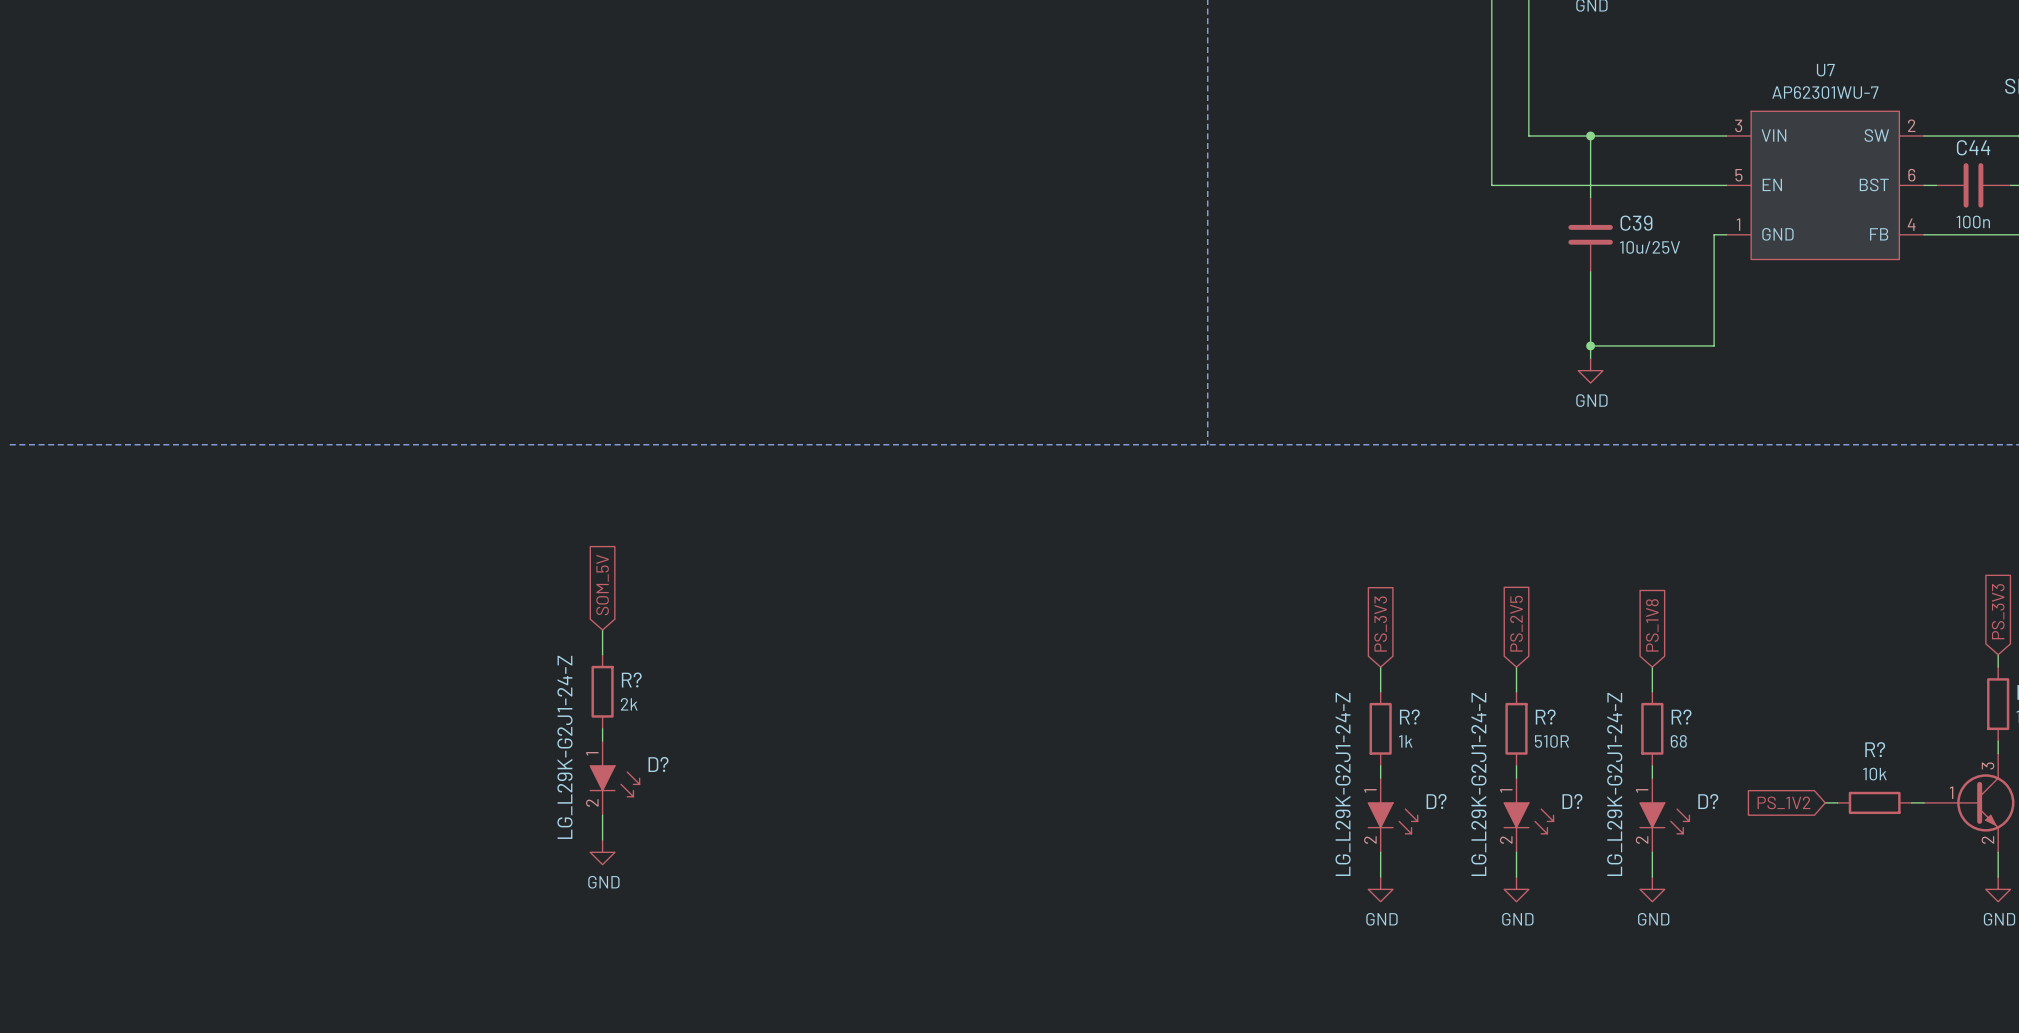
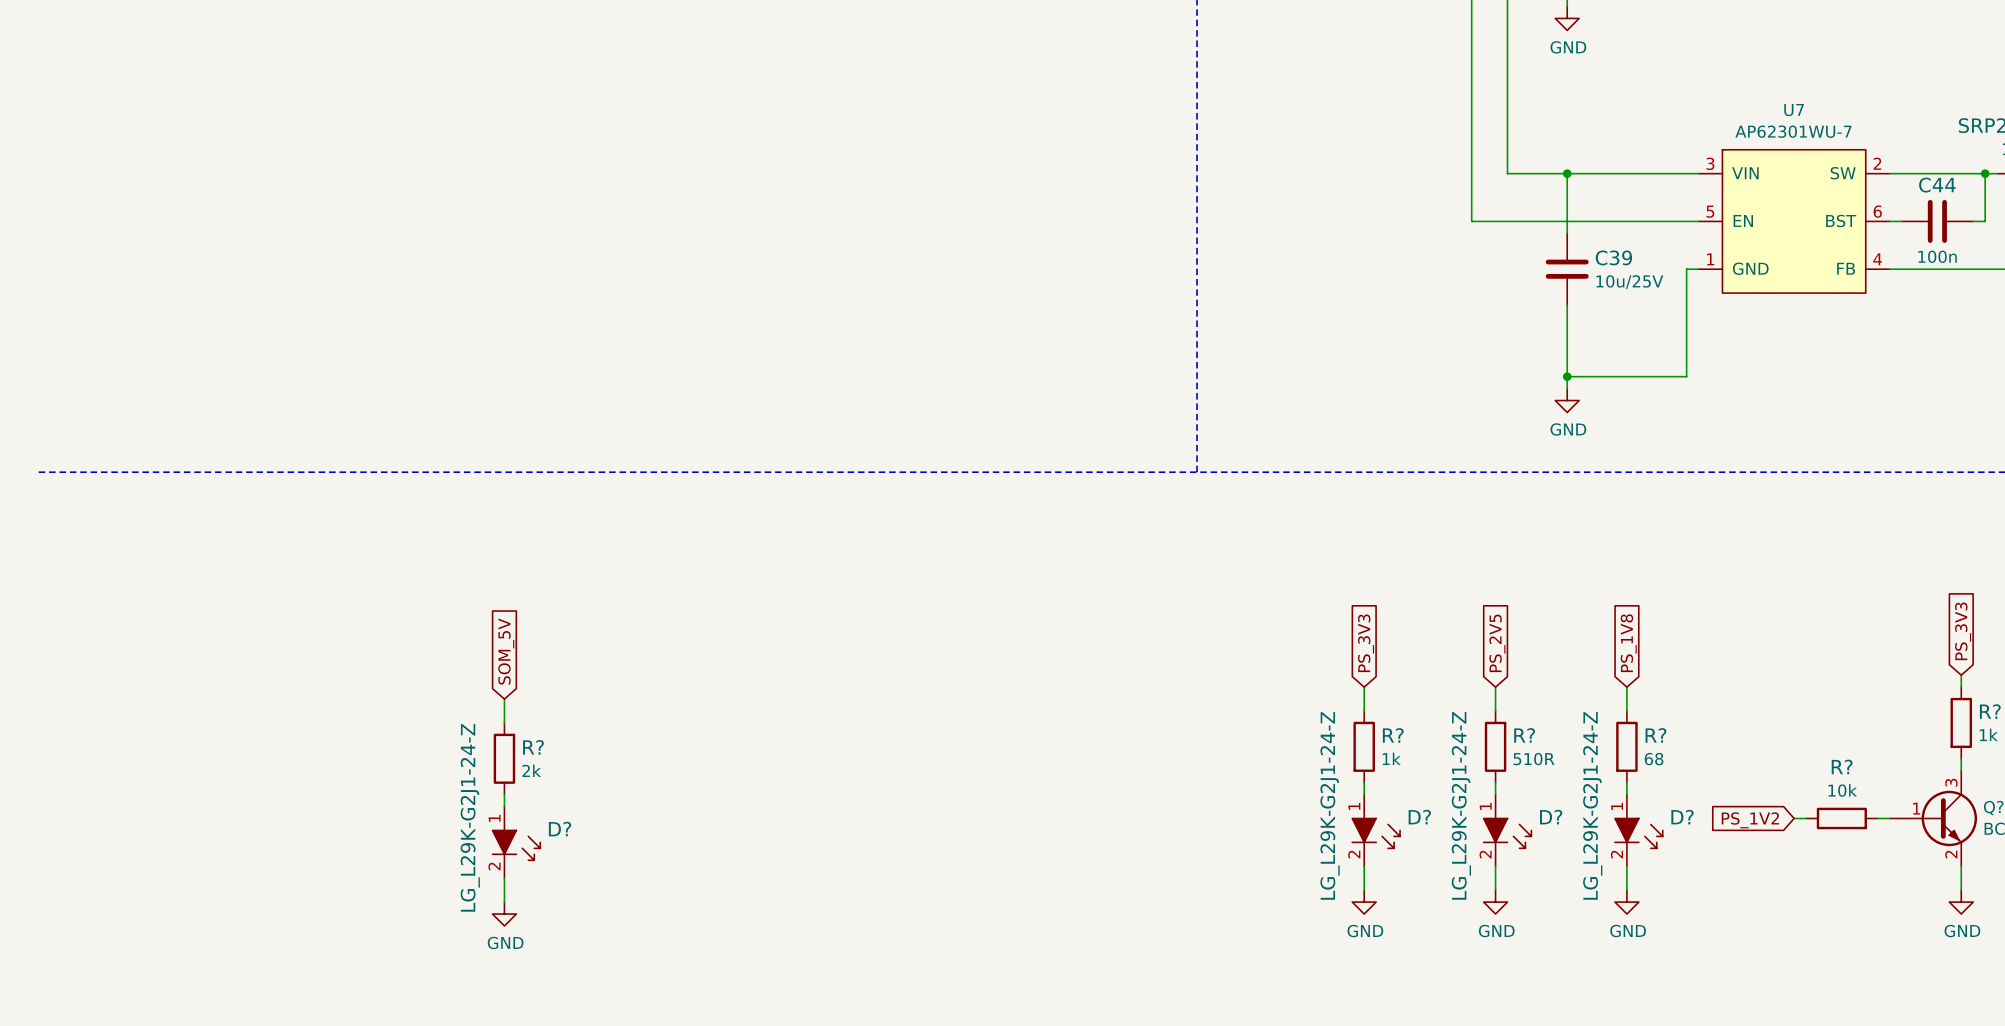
global label position: SOM_5V (602, 585) -> SOM_5V (506, 651)
wire: (602, 630) (602, 654) -> (504, 699) (504, 722)
R? position: (602, 691) -> (504, 758)
wire: (602, 728) (602, 741) -> (504, 794) (504, 806)
D? position: (614, 778) -> (516, 842)
wire: (602, 815) (602, 839) -> (504, 878) (504, 902)
power symbol position: GND (602, 852) -> GND (504, 914)

